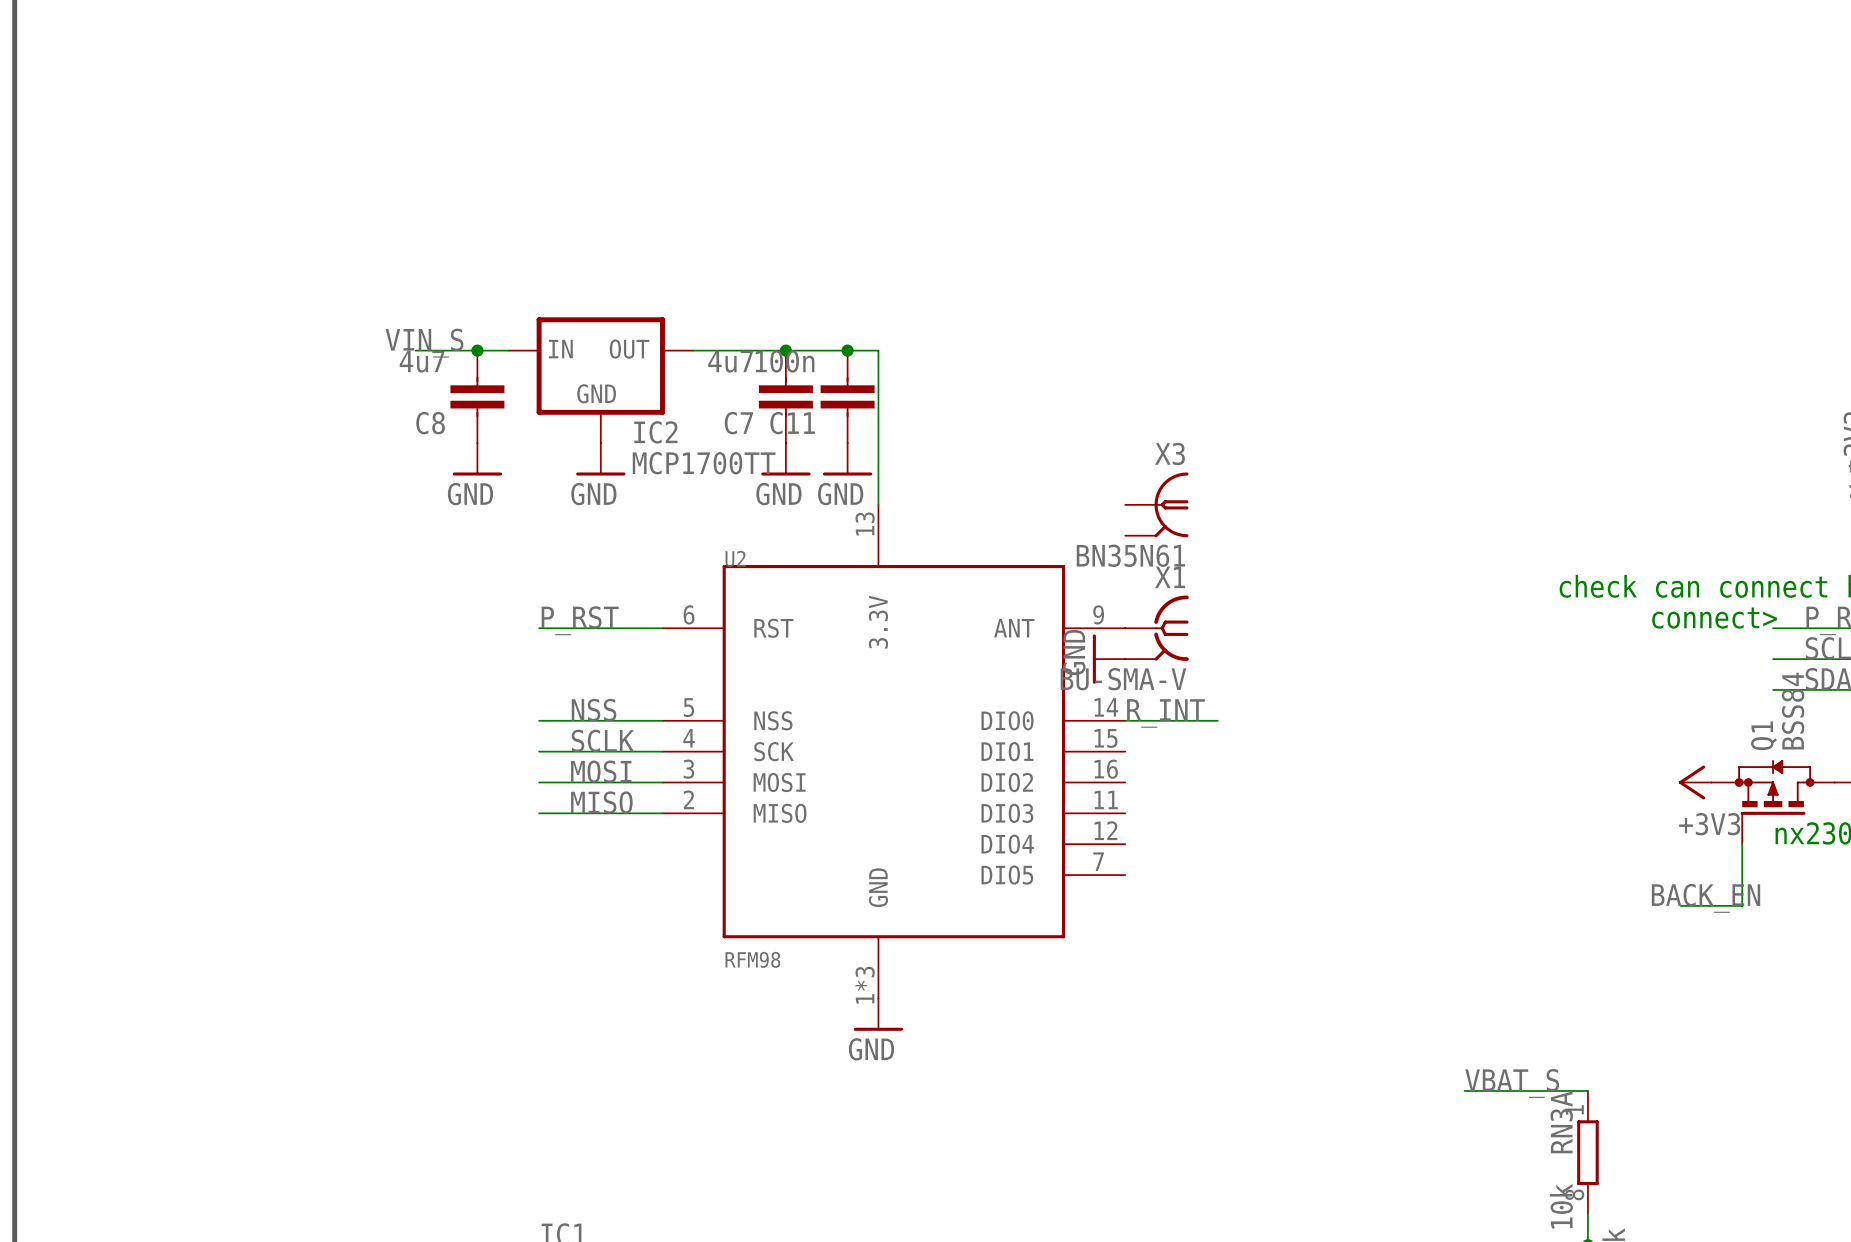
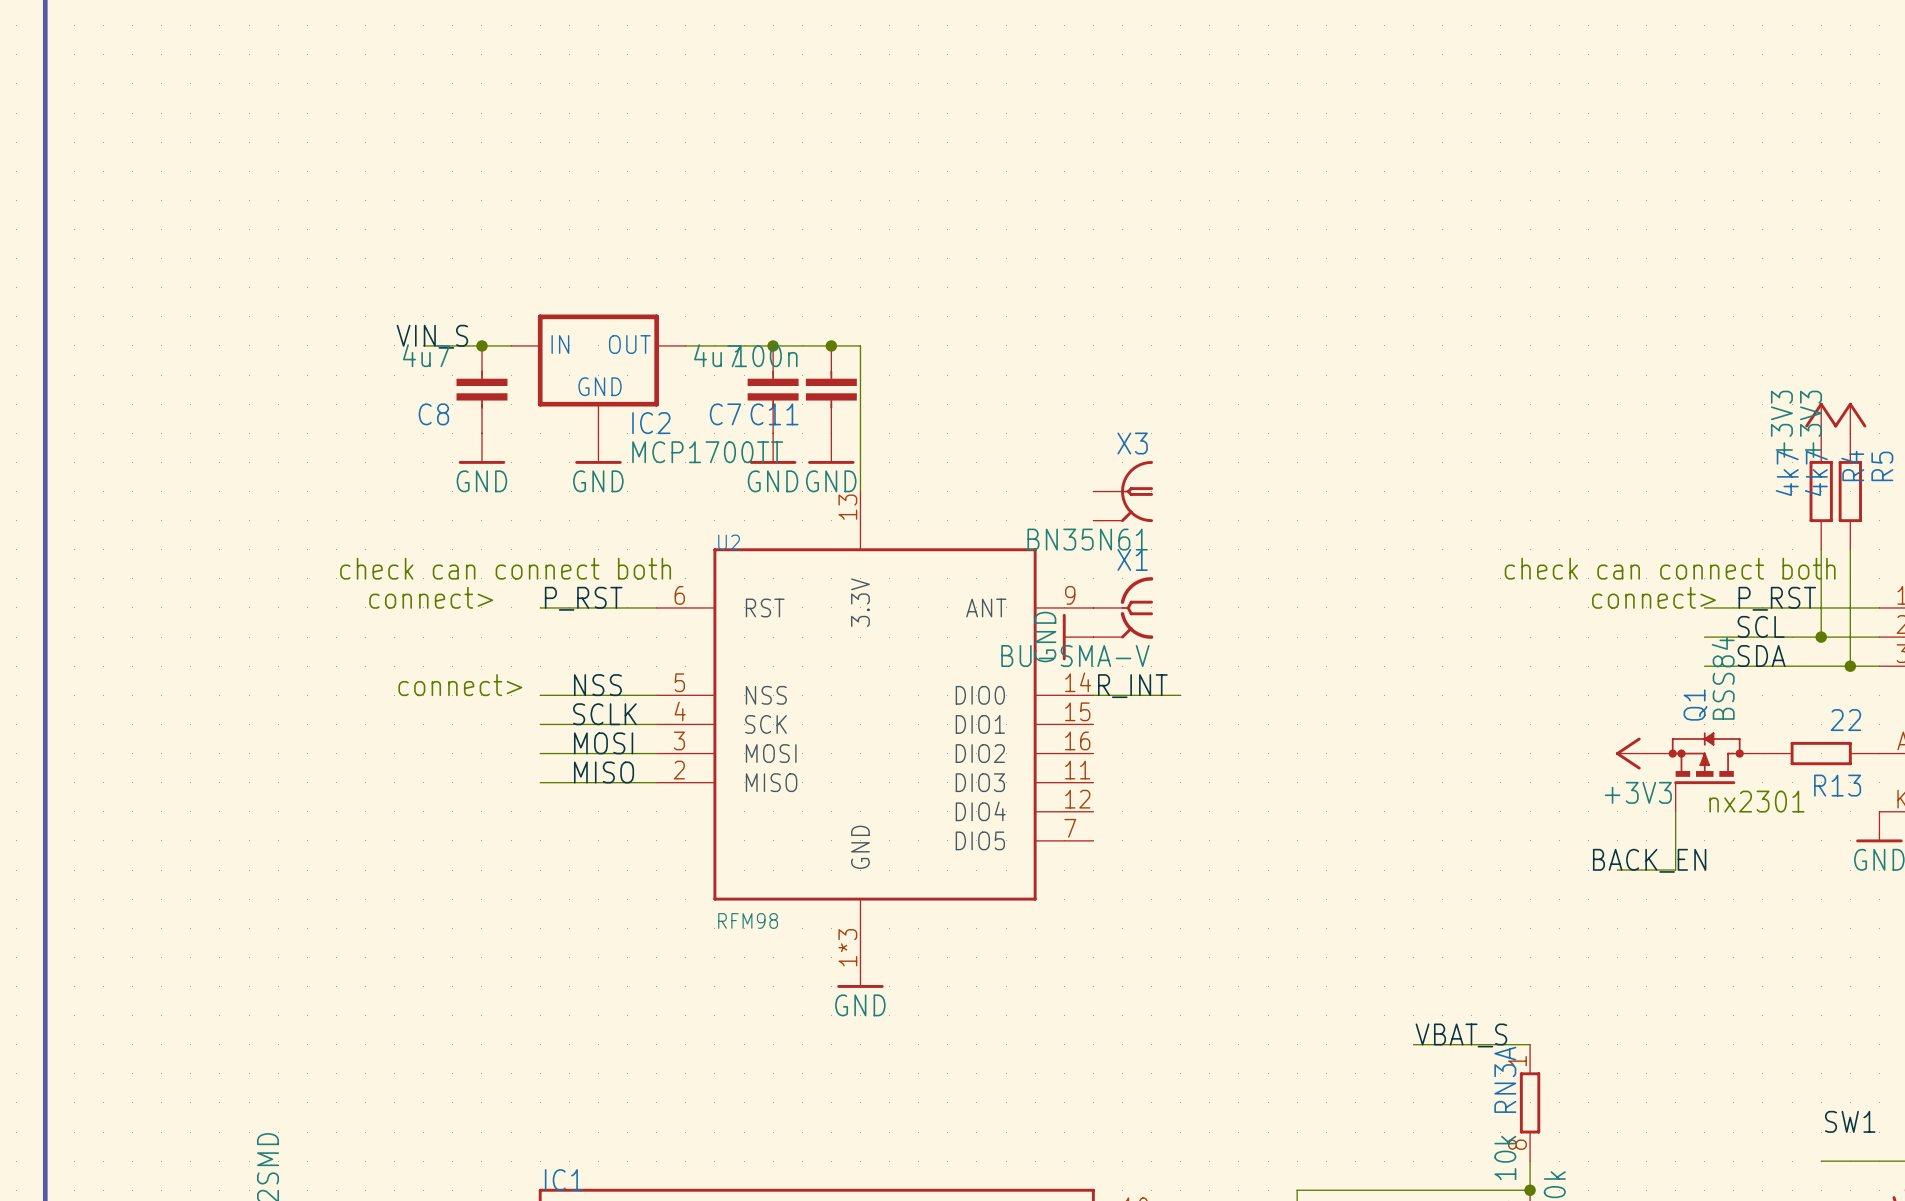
text: none -> check can connect both (505, 568)
text: none -> connect> (431, 597)
text: none -> connect> (460, 685)

